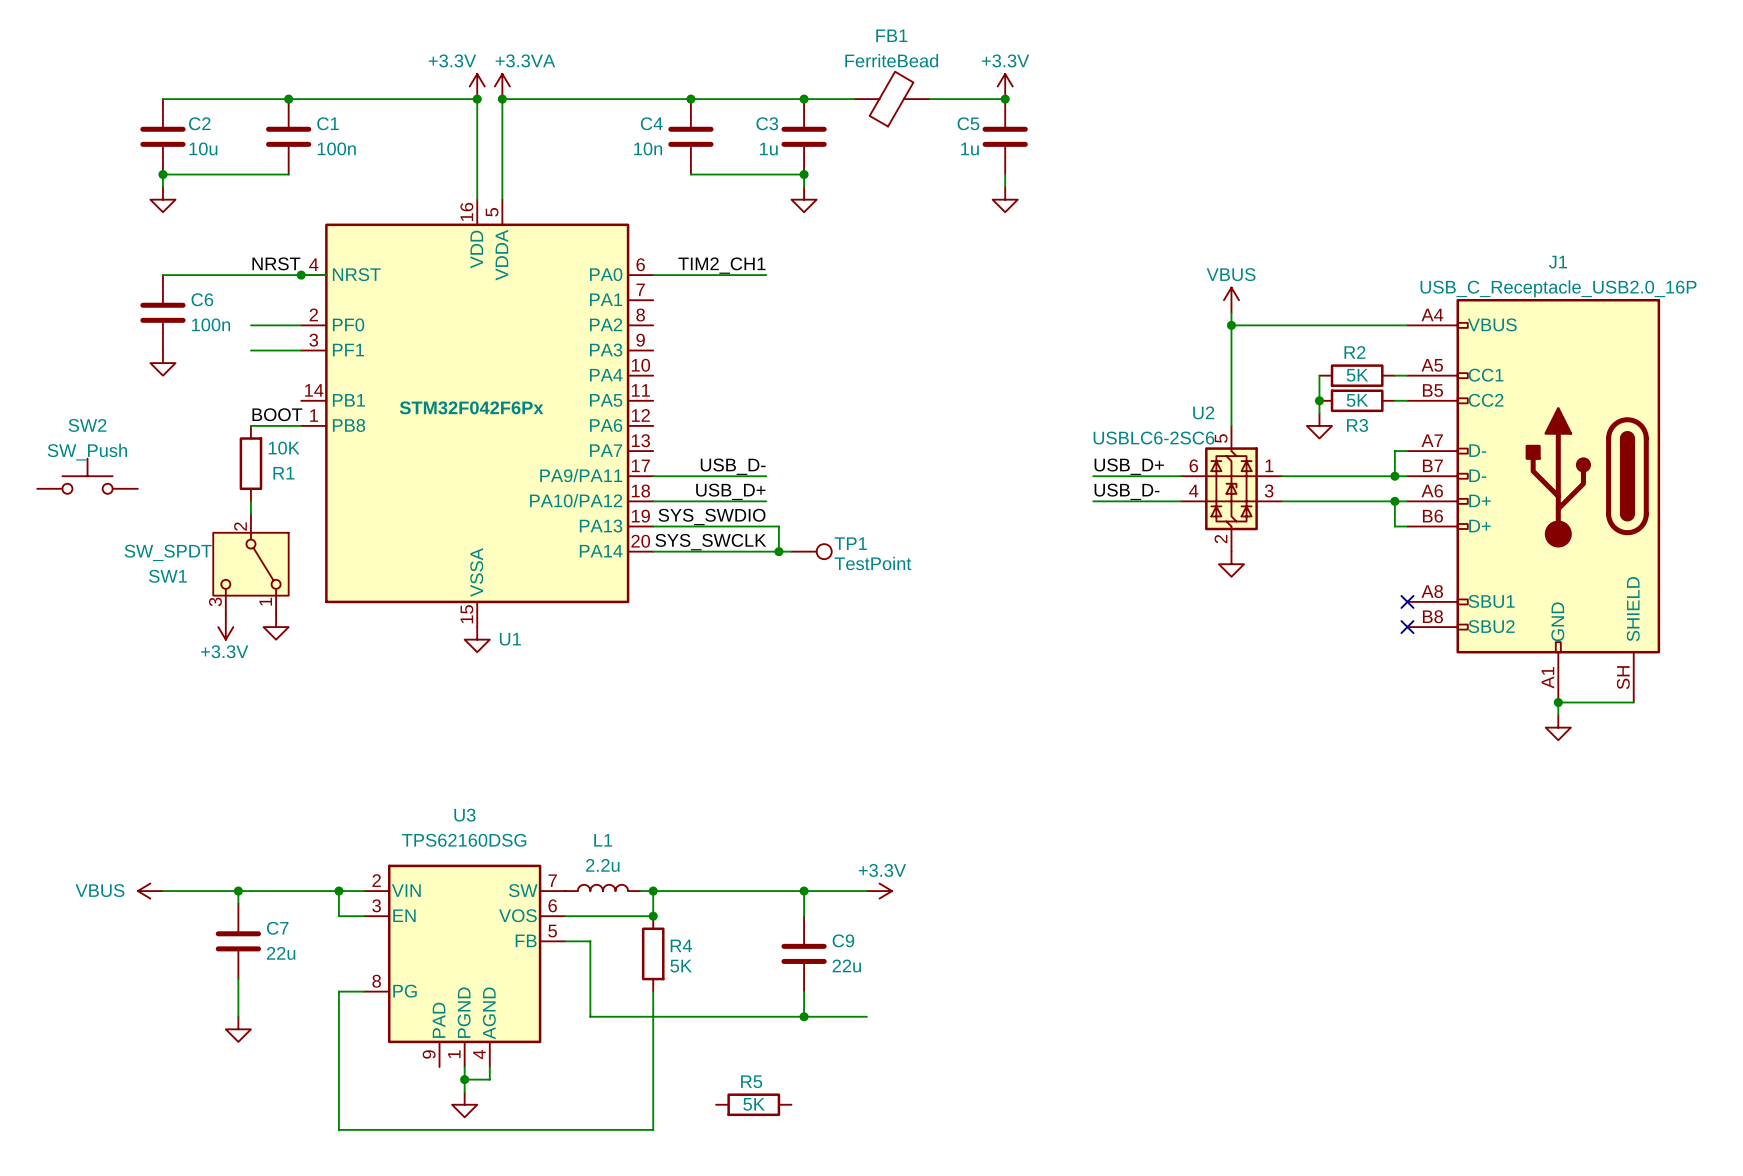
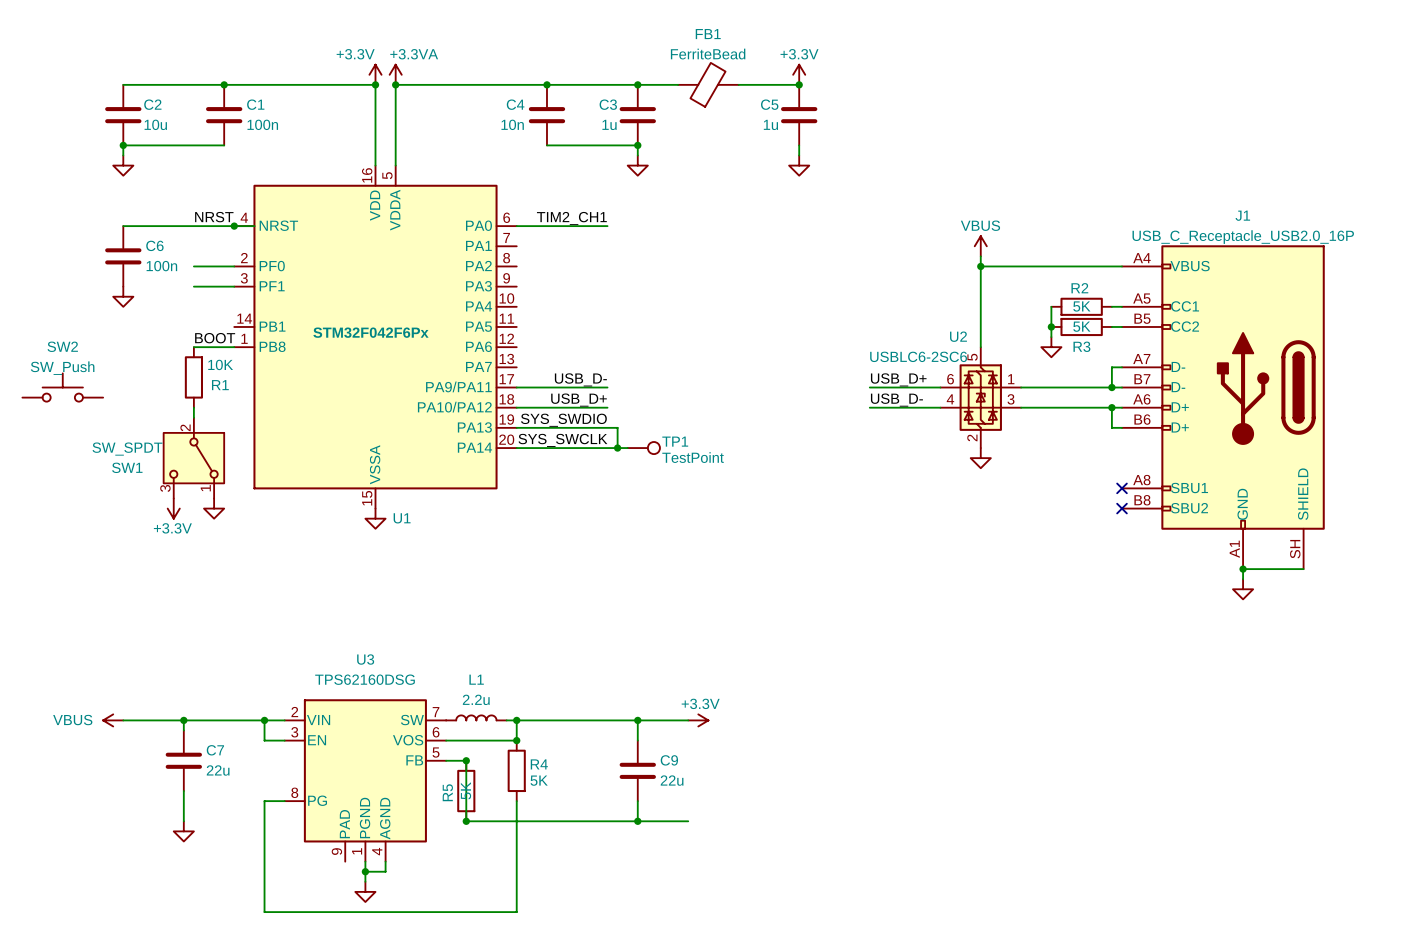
junction: none -> (466, 760)
junction: none -> (466, 821)
R5 name position: R5 (751, 1081) -> R5 (447, 792)
R5 rotation: 0° (753, 1104) -> 90° clockwise (466, 791)
R5 position: (753, 1104) -> (466, 791)

